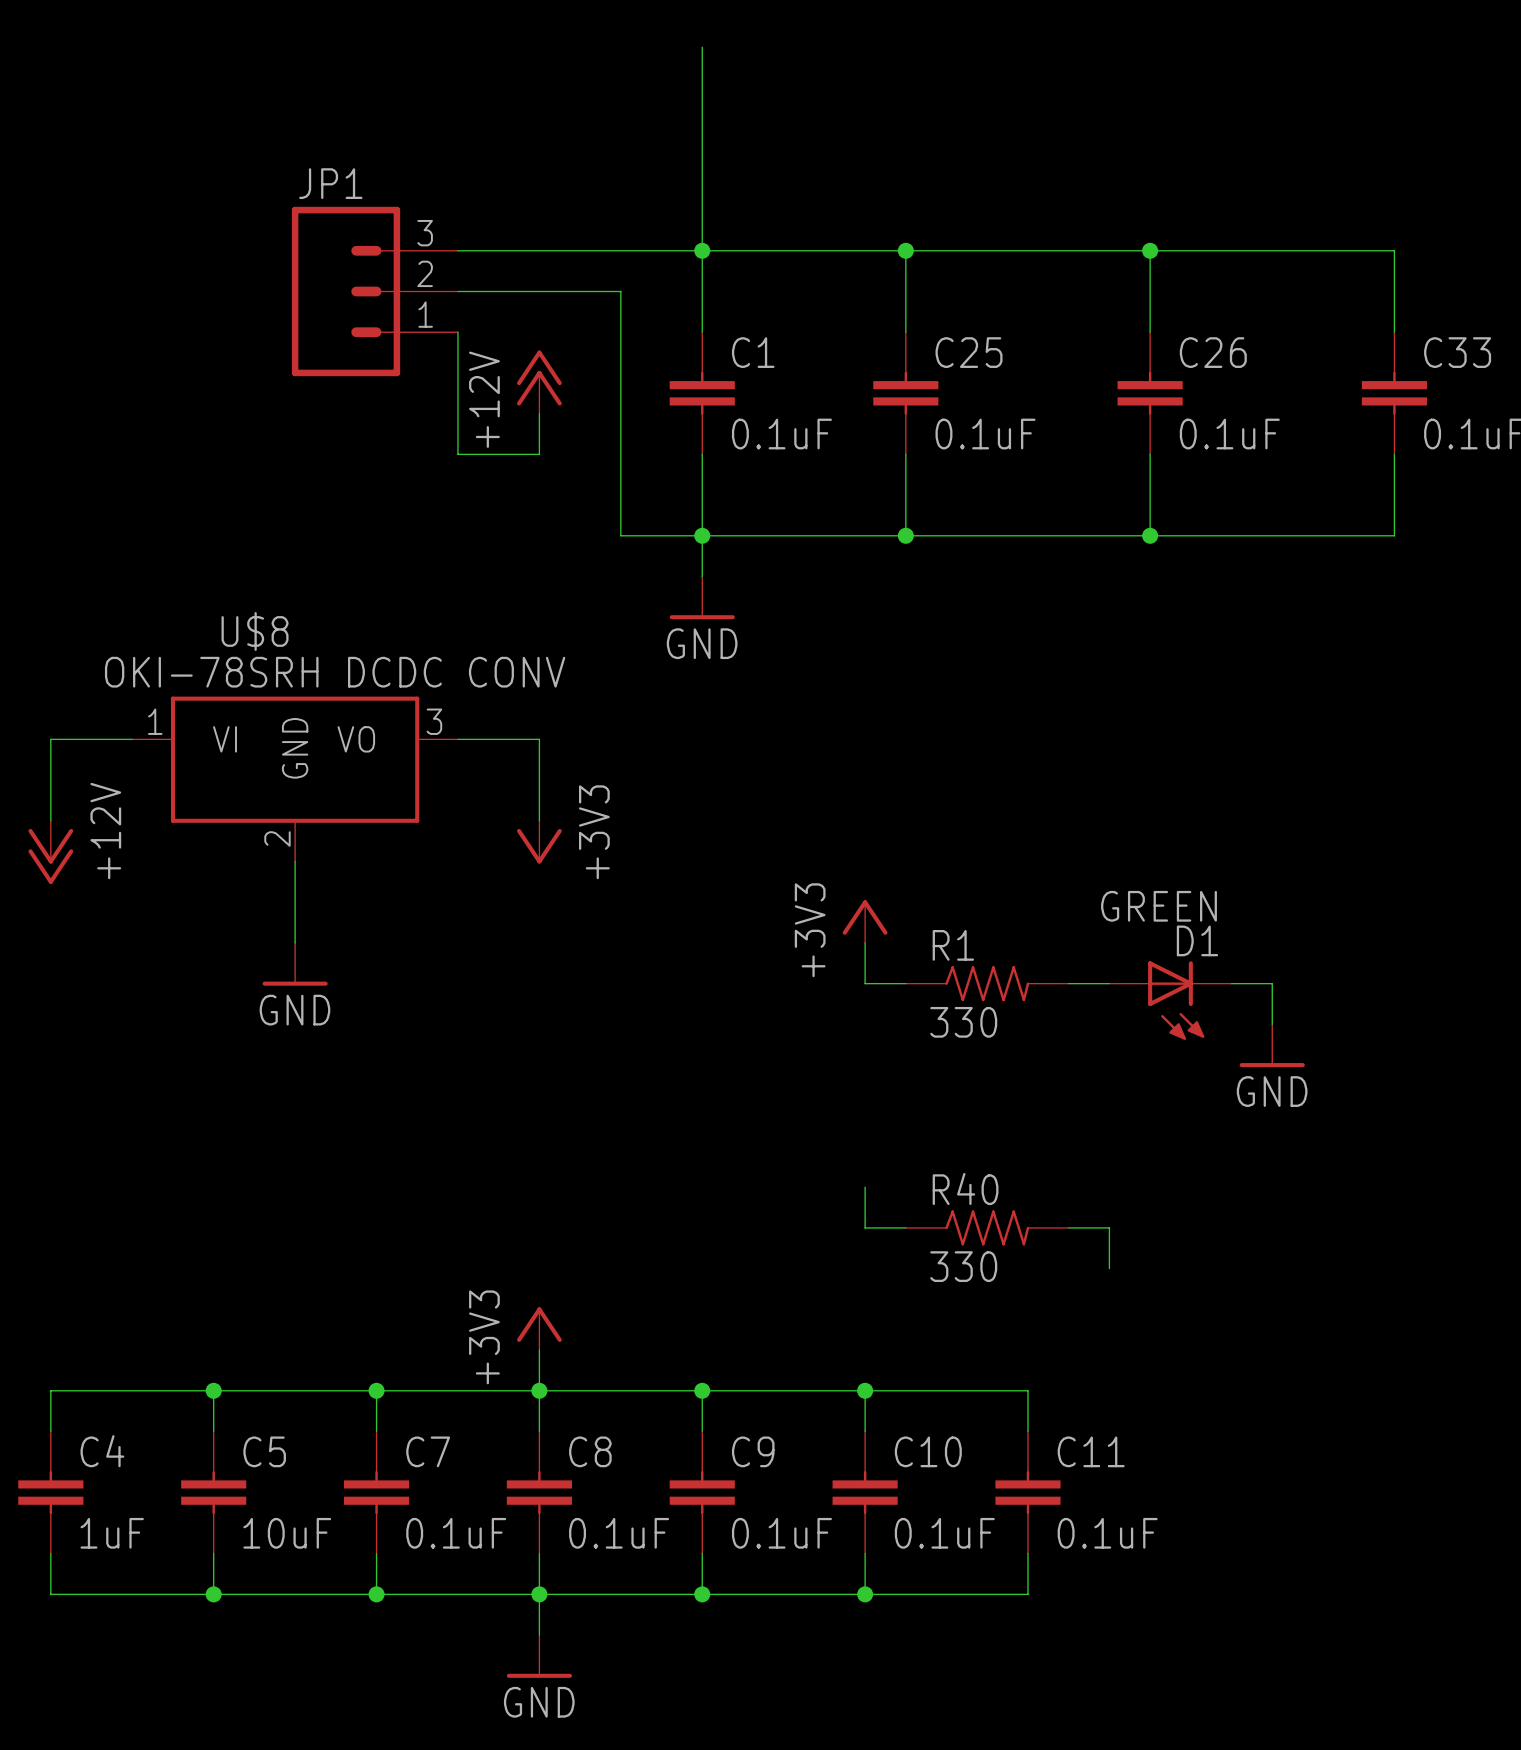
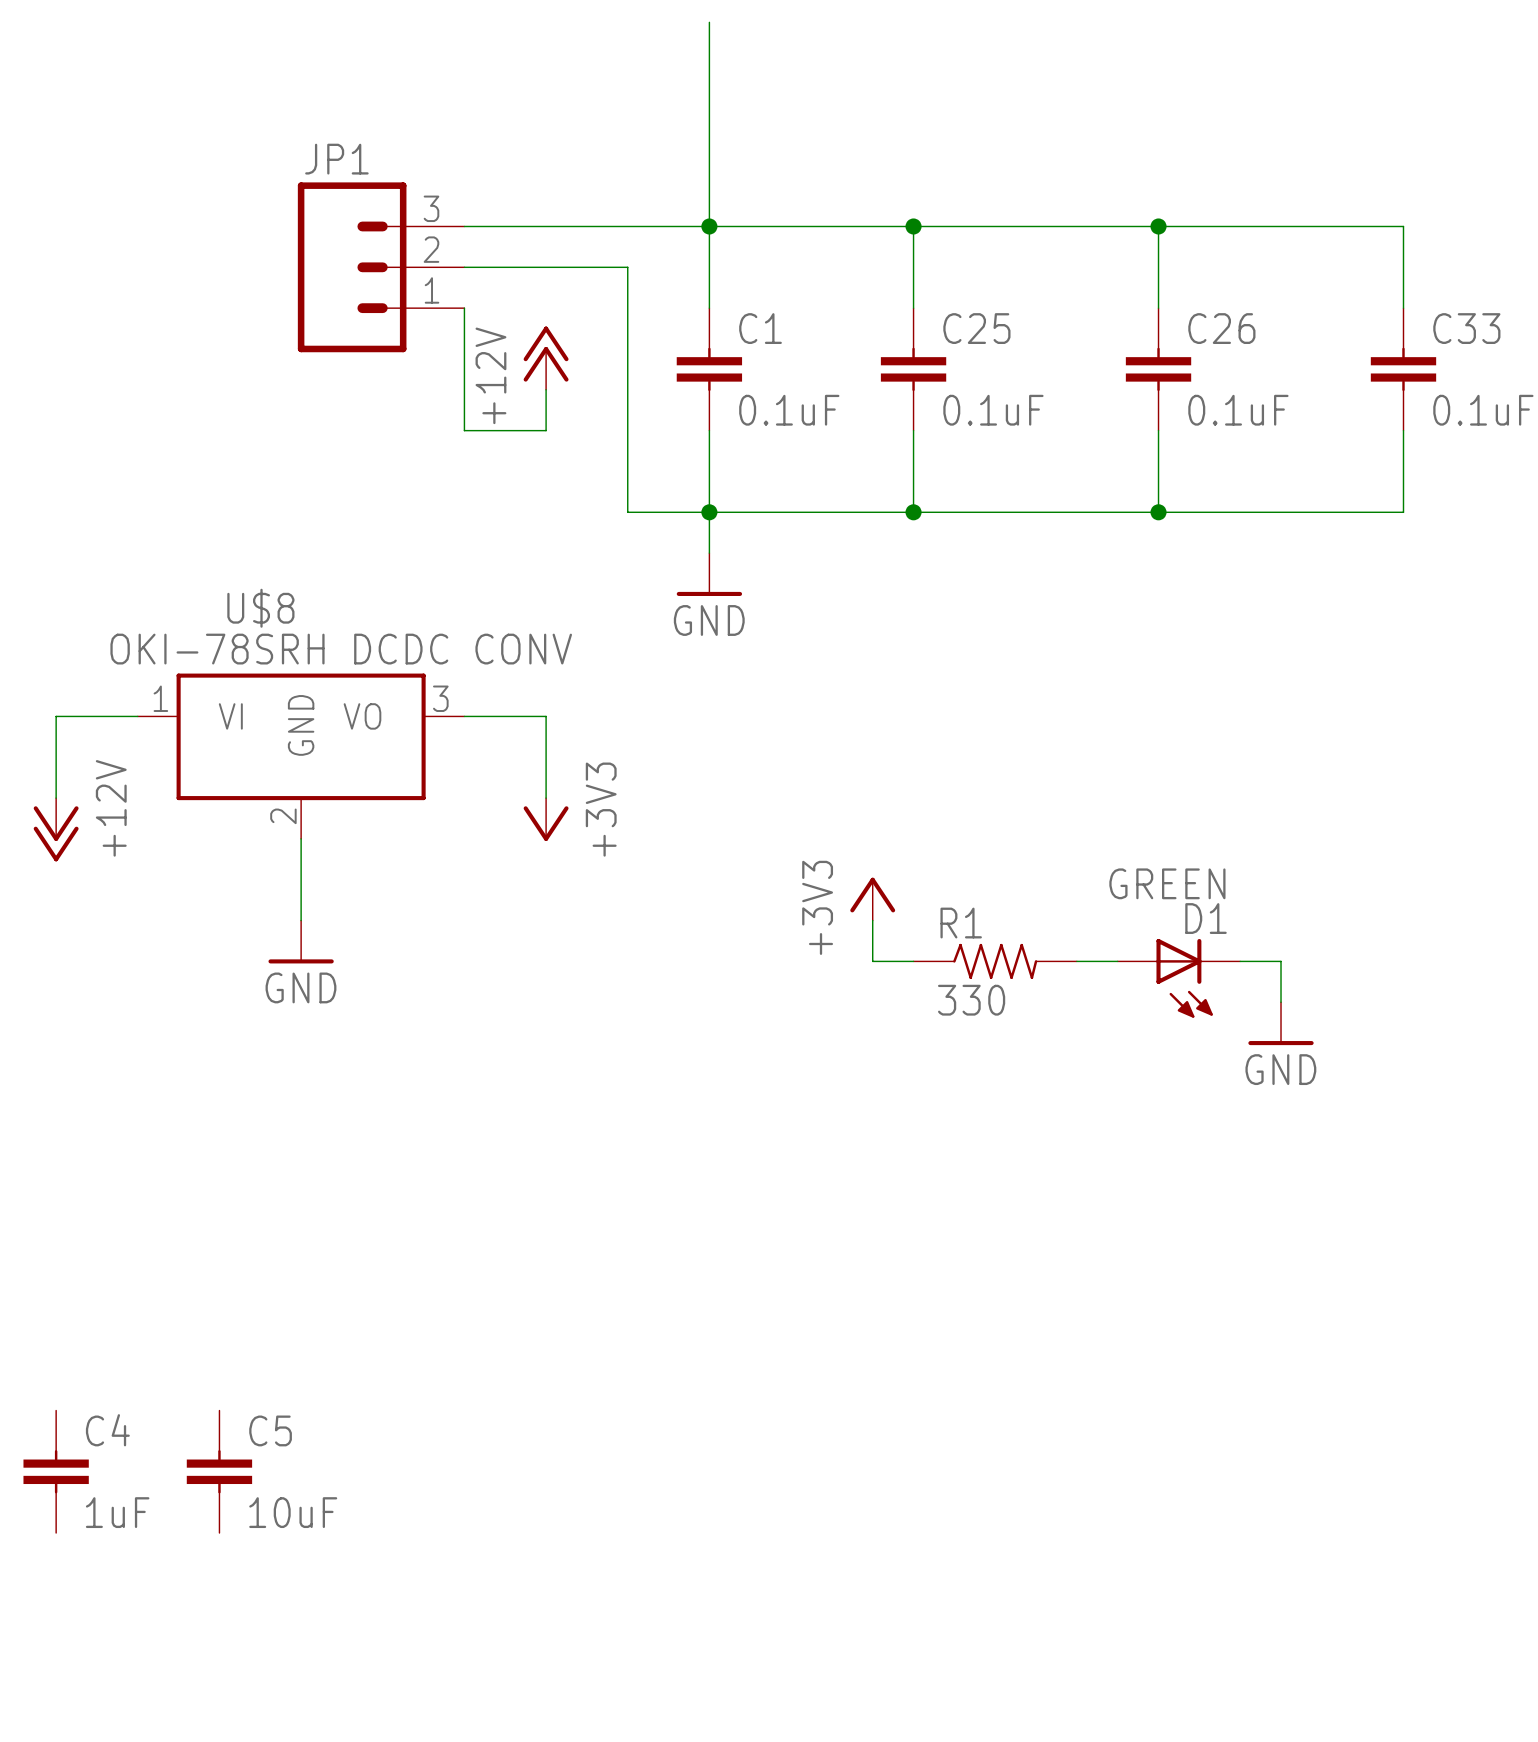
wire: (865, 1187) (865, 1227) (905, 1227) -> none
R40: 330 (987, 1227) -> none
wire: (1068, 1227) (1109, 1227) (1109, 1268) -> none
power symbol: +3V3 (539, 1328) -> none
wire: (539, 1350) (539, 1431) -> none
wire: (213, 1390) (213, 1431) -> none
junction: (213, 1390) -> none
wire: (376, 1390) (376, 1431) -> none
junction: (376, 1390) -> none
junction: (539, 1390) -> none
wire: (702, 1390) (702, 1431) -> none
junction: (702, 1390) -> none
wire: (865, 1390) (865, 1431) -> none
junction: (865, 1390) -> none
wire: (50, 1431) (50, 1390) (1027, 1390) (1027, 1431) -> none
C7: 0.1uF (376, 1492) -> none
C8: 0.1uF (539, 1492) -> none
C9: 0.1uF (702, 1492) -> none
C10: 0.1uF (865, 1492) -> none
C11: 0.1uF (1027, 1492) -> none
wire: (50, 1553) (50, 1594) (1027, 1594) (1027, 1553) -> none
wire: (213, 1553) (213, 1594) -> none
wire: (376, 1553) (376, 1594) -> none
wire: (539, 1553) (539, 1635) -> none
wire: (702, 1553) (702, 1594) -> none
wire: (865, 1553) (865, 1594) -> none
junction: (213, 1594) -> none
junction: (376, 1594) -> none
junction: (539, 1594) -> none
junction: (702, 1594) -> none
junction: (865, 1594) -> none
power symbol: GND (539, 1656) -> none

